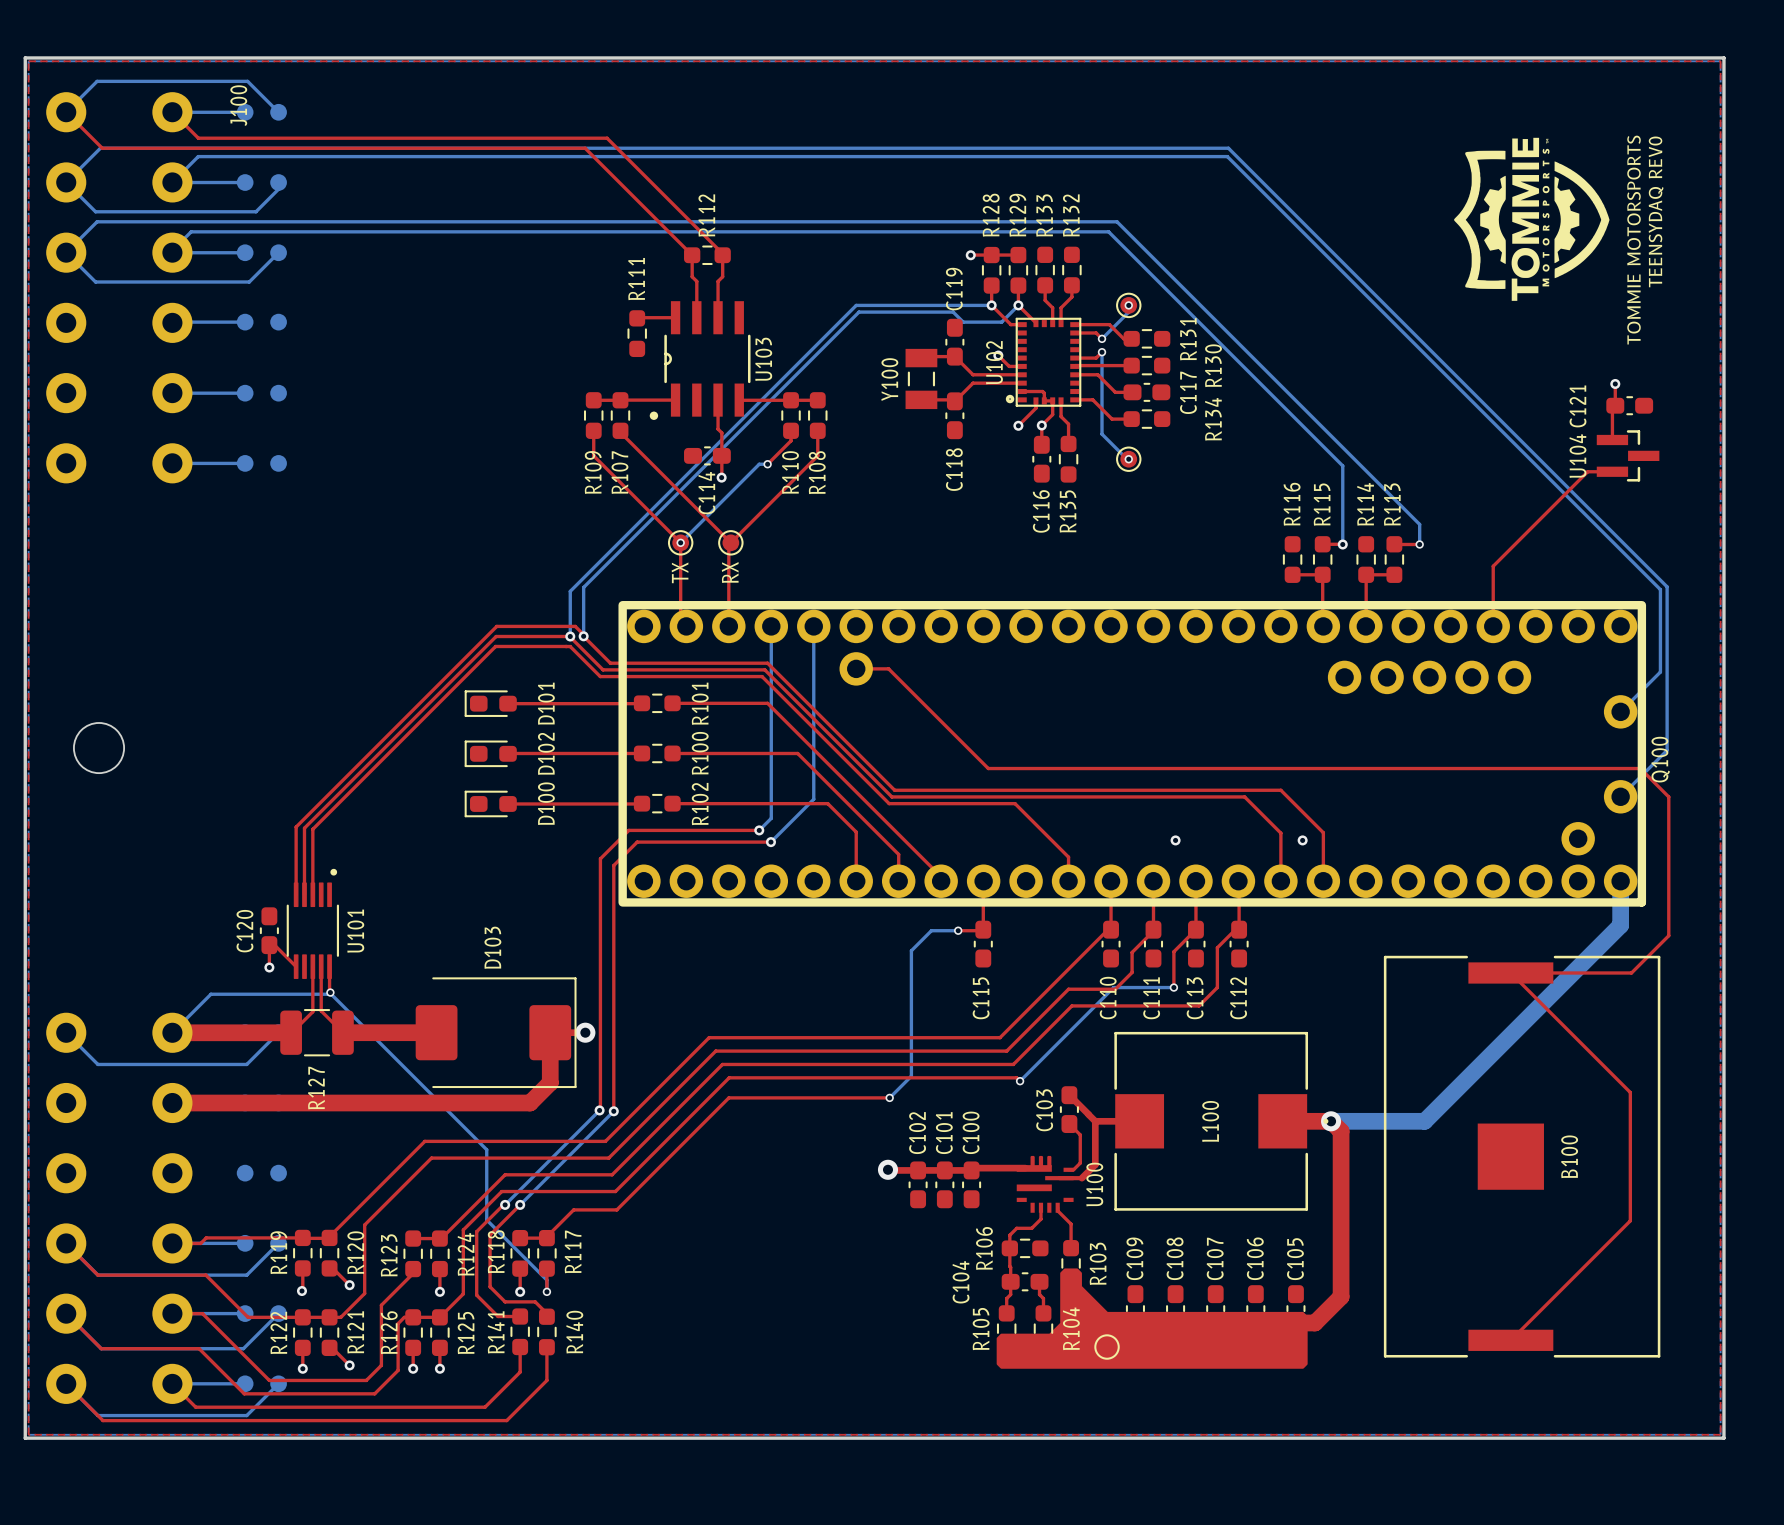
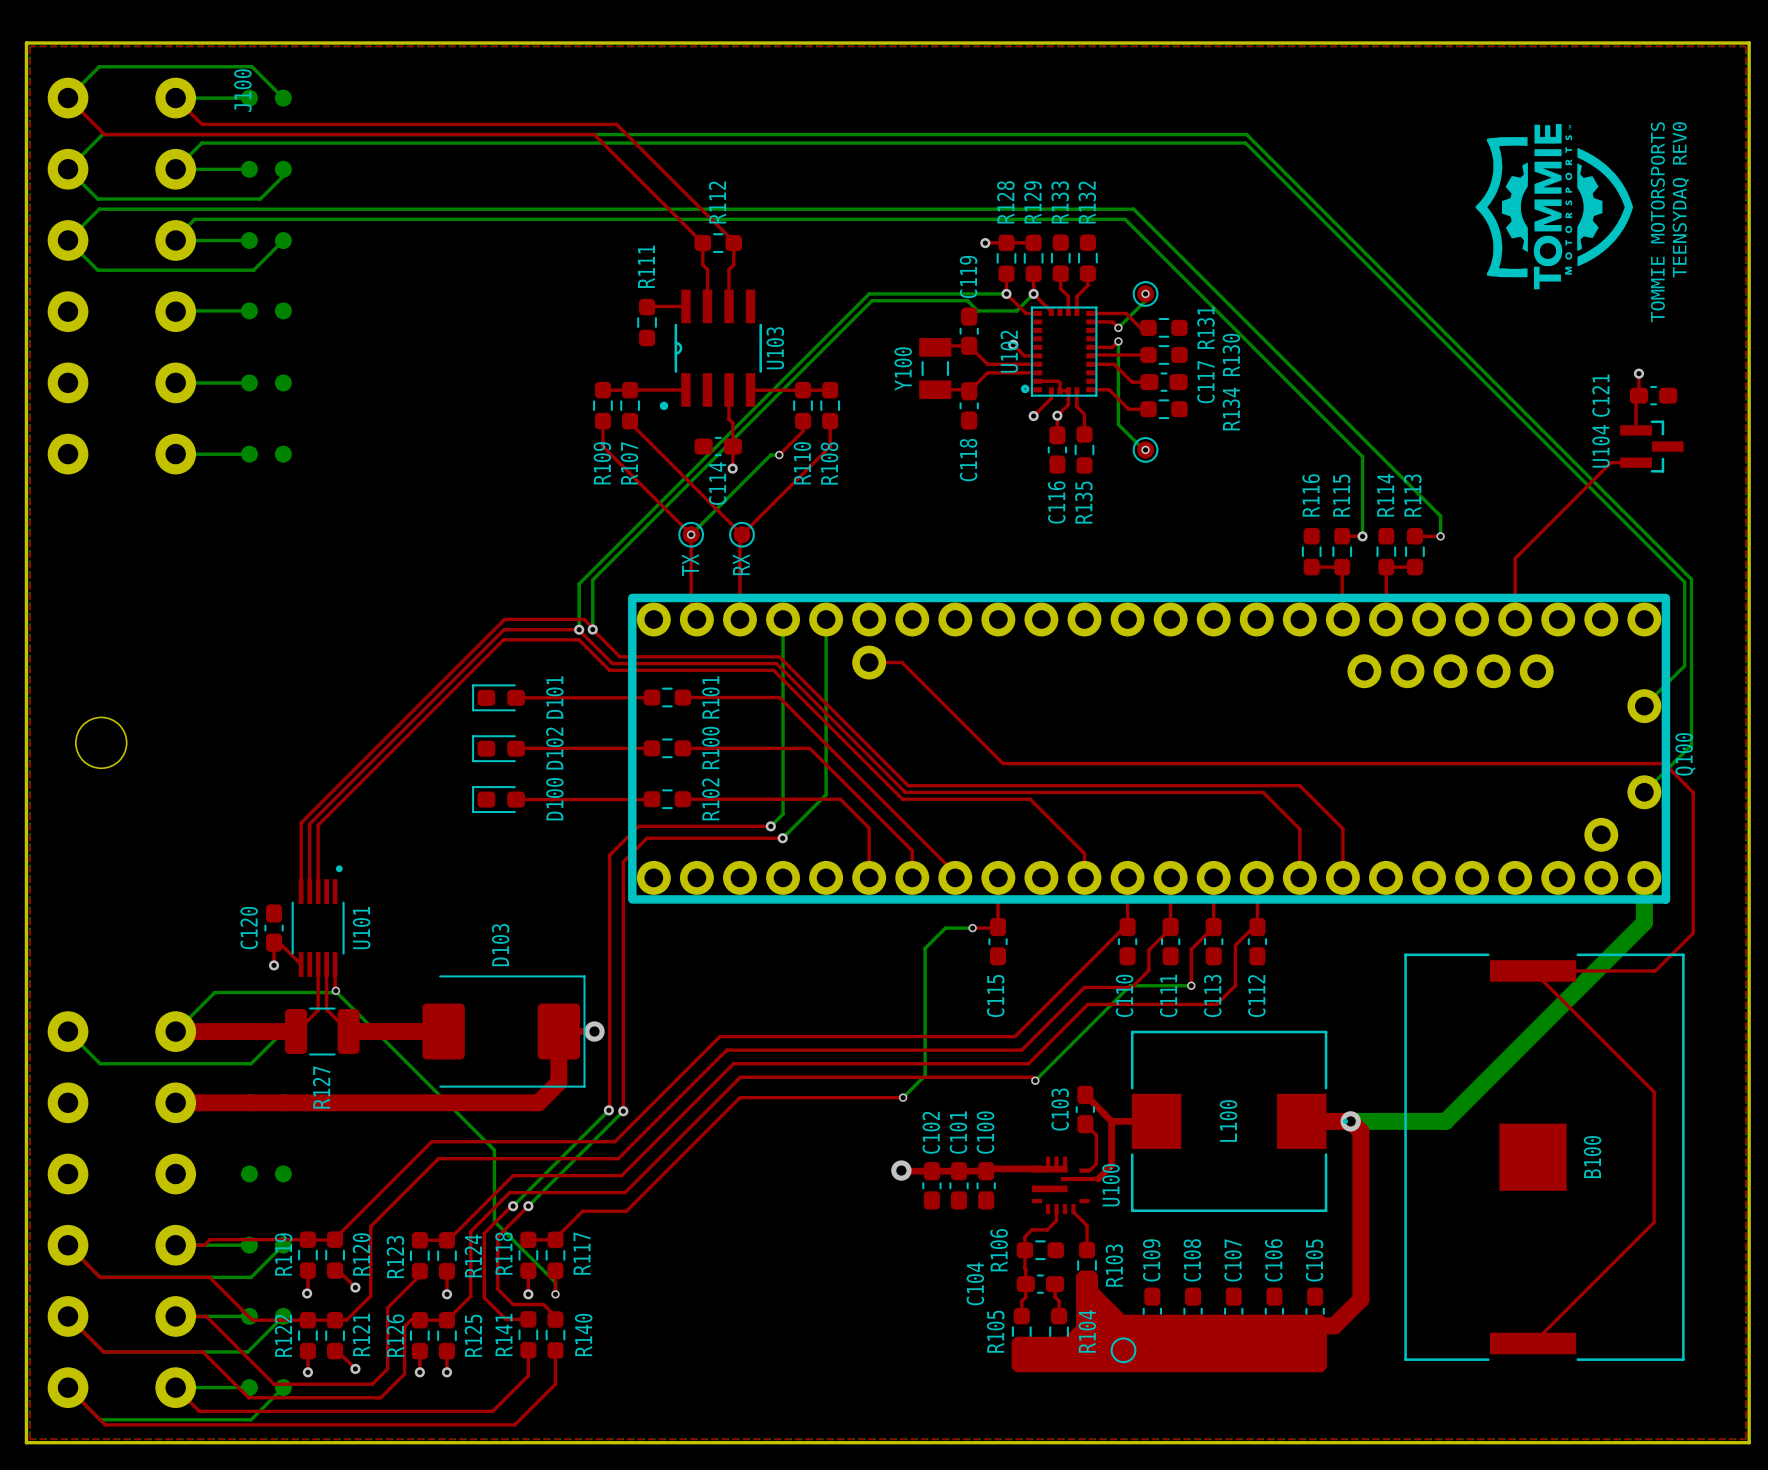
via: (1175, 840) -> none
via: (1302, 840) -> none

